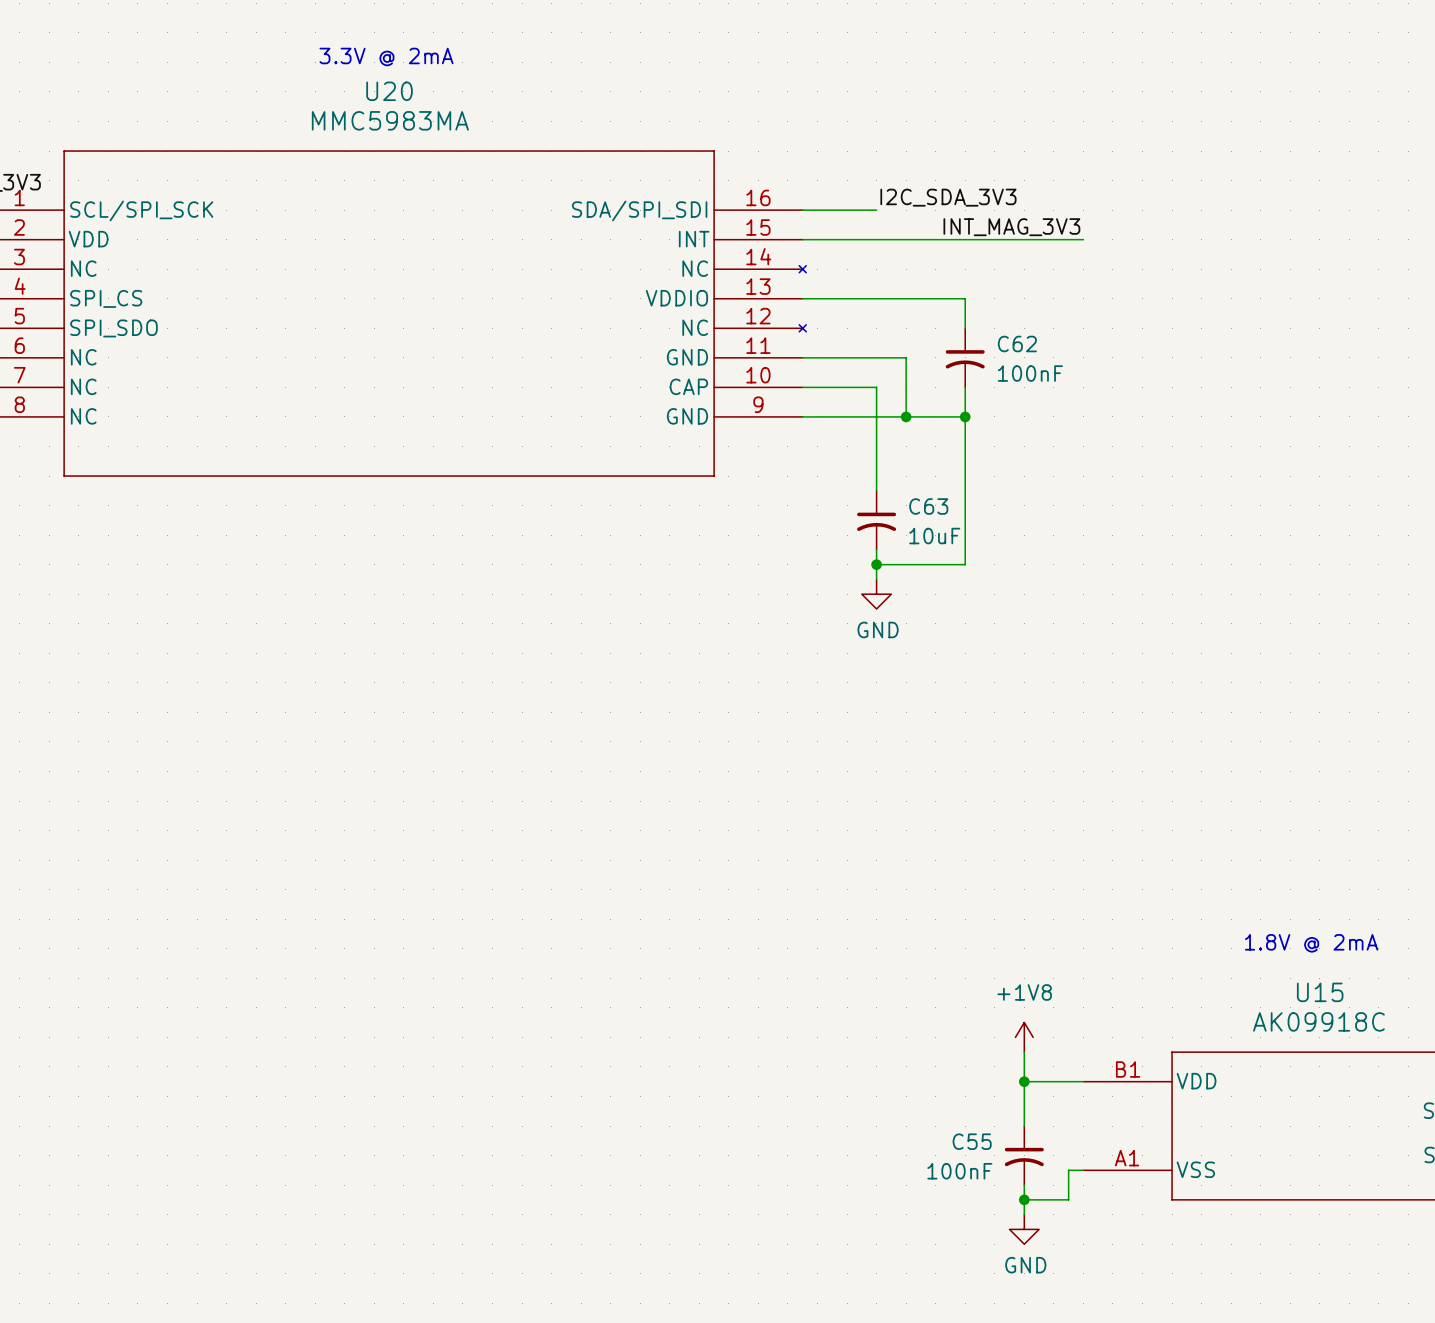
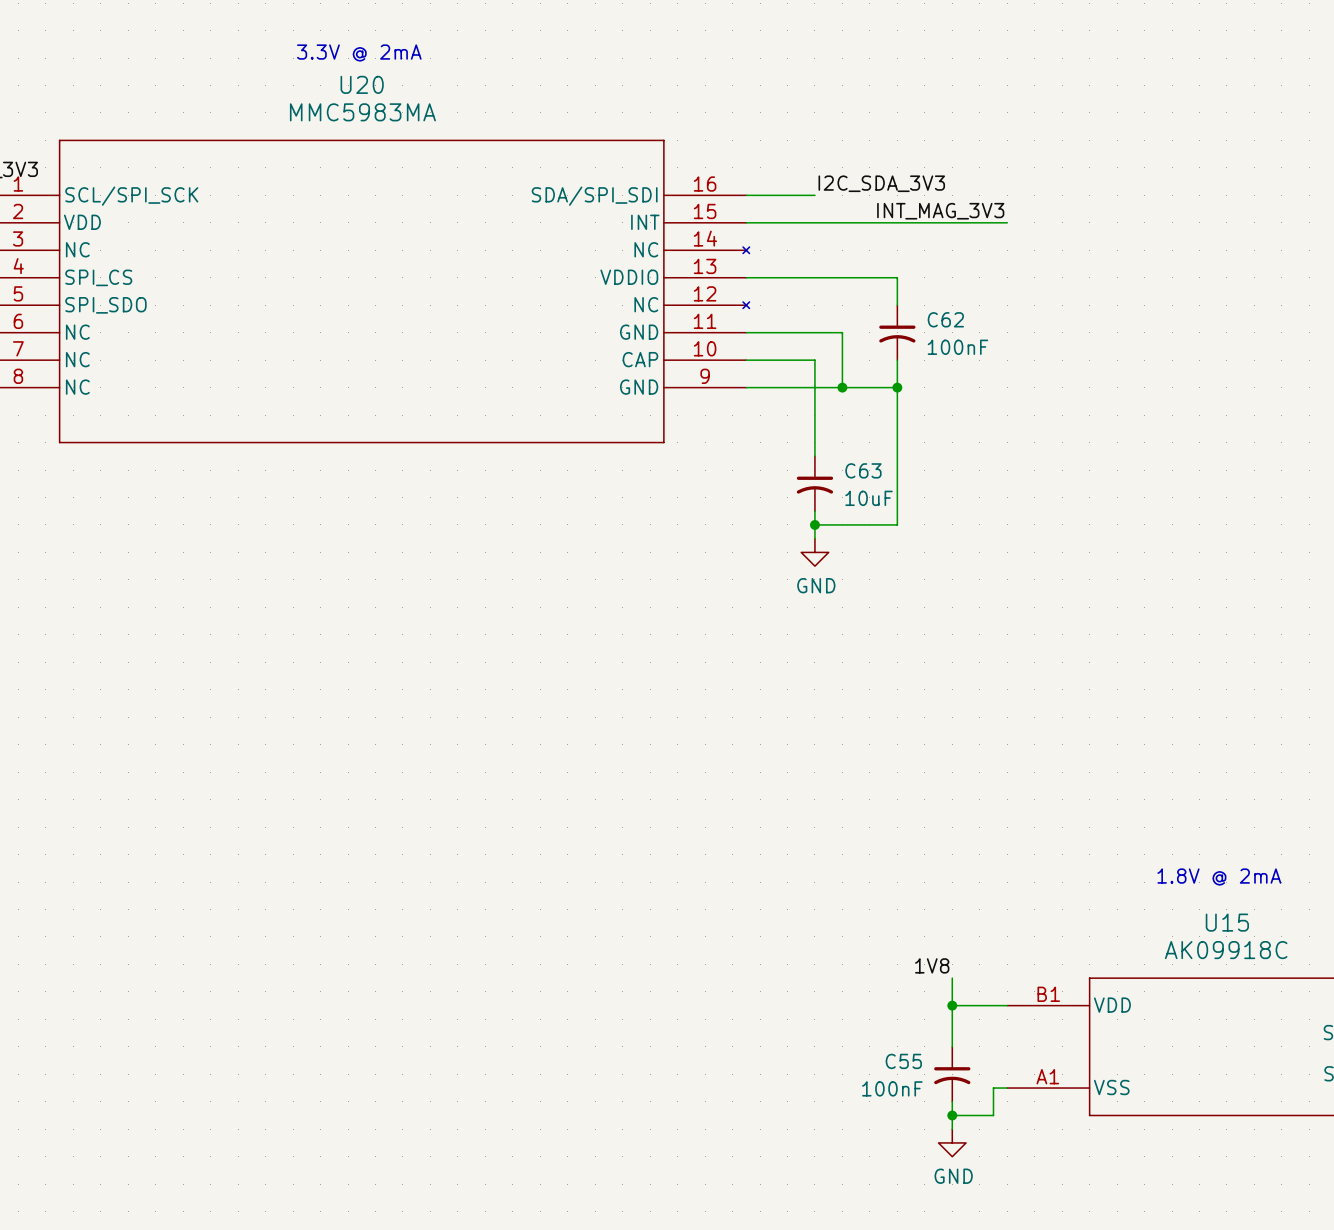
power symbol: +1V8 (1024, 1037) -> none
label: none -> 1V8 (932, 965)

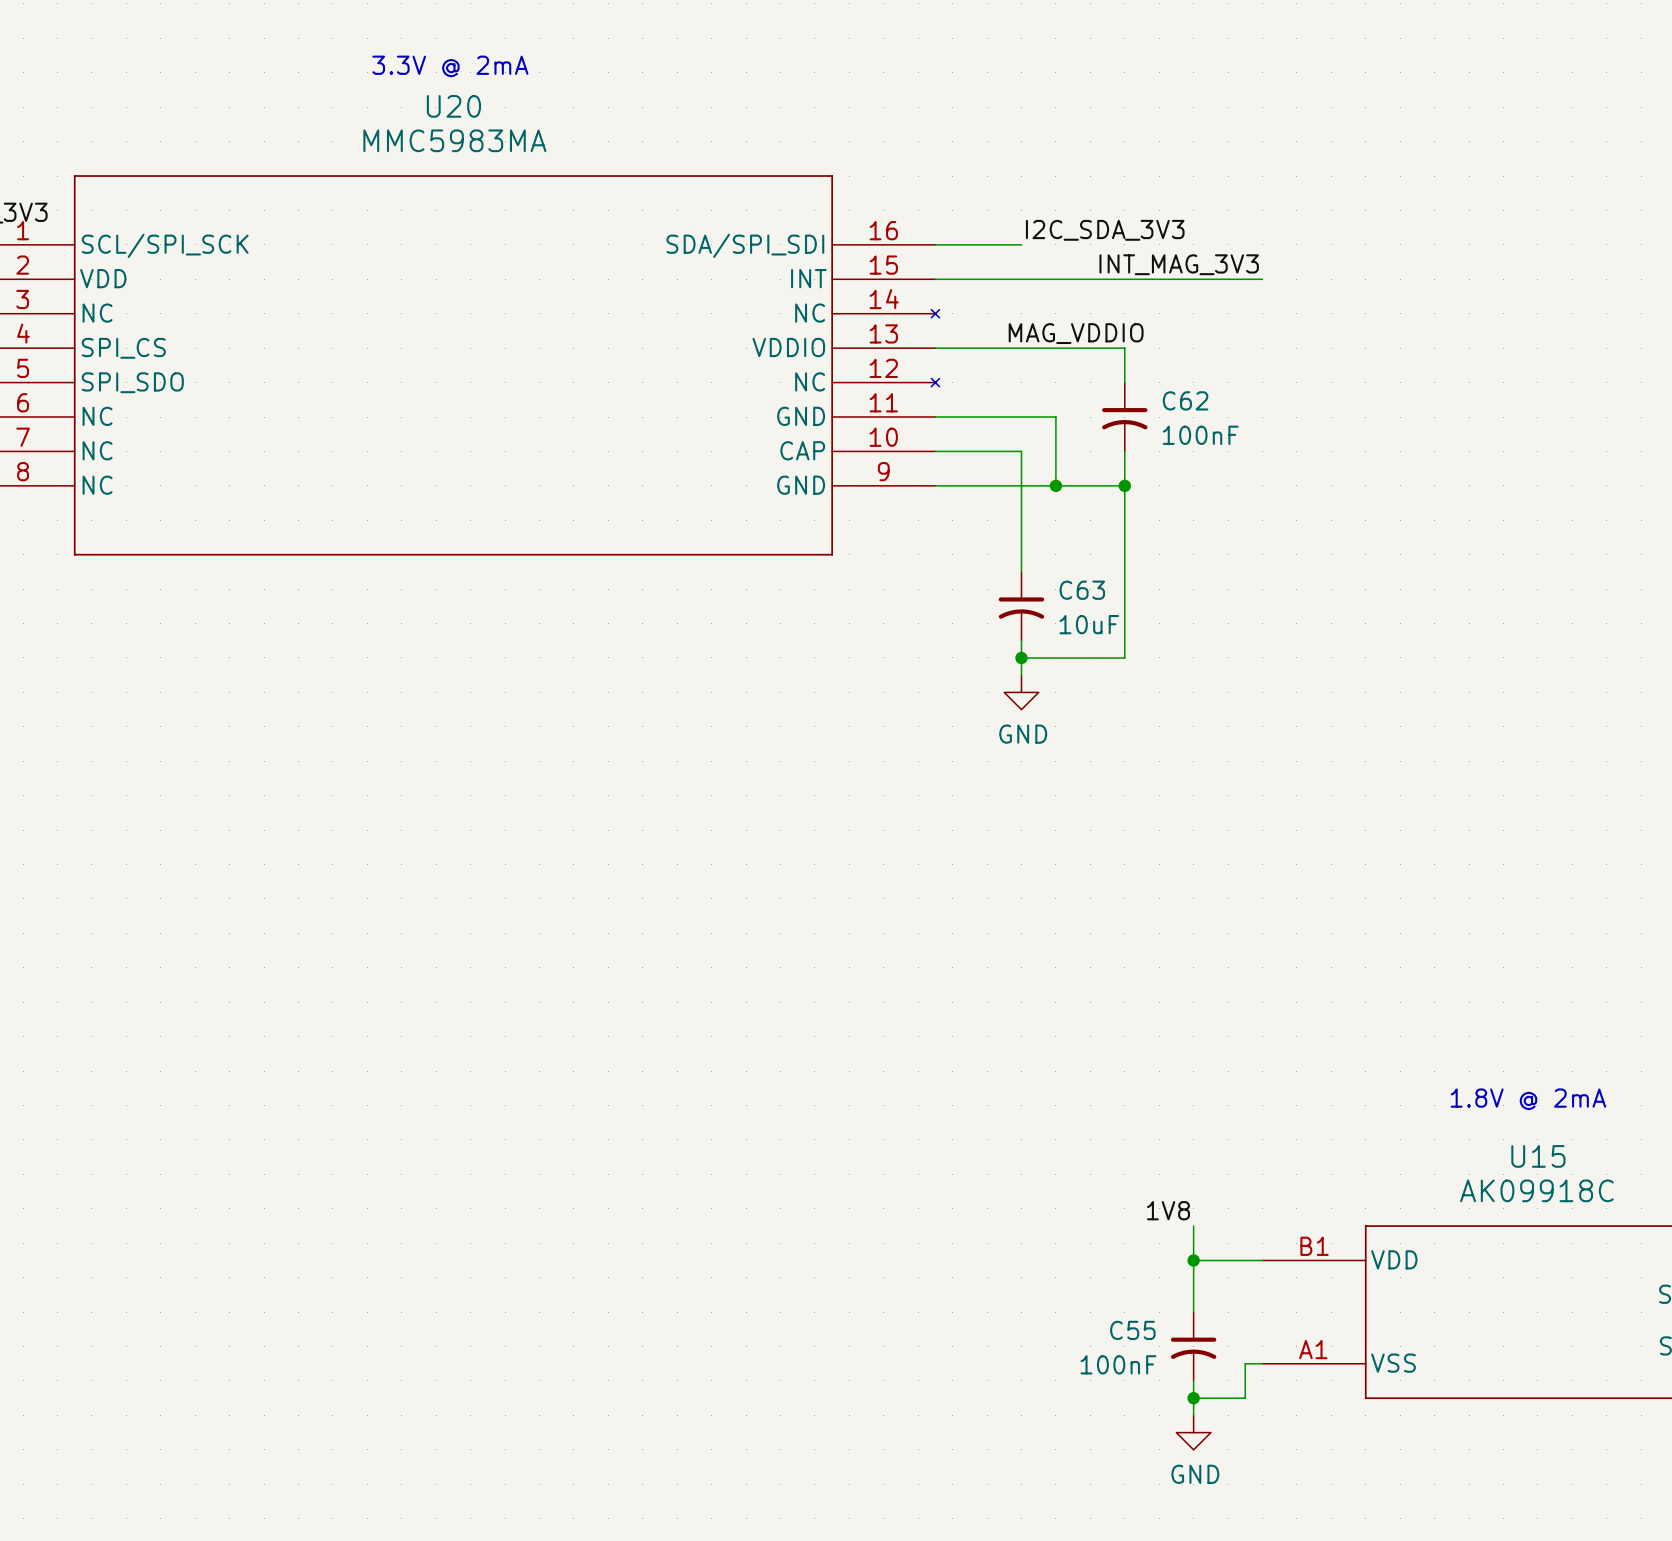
label: none -> MAG_VDDIO (1076, 333)

